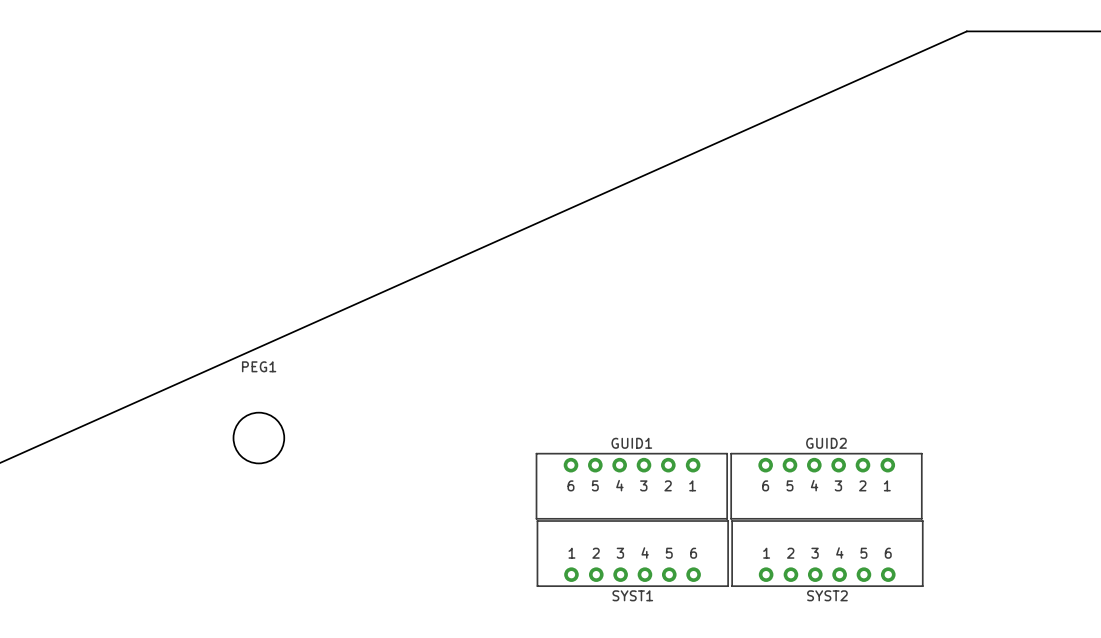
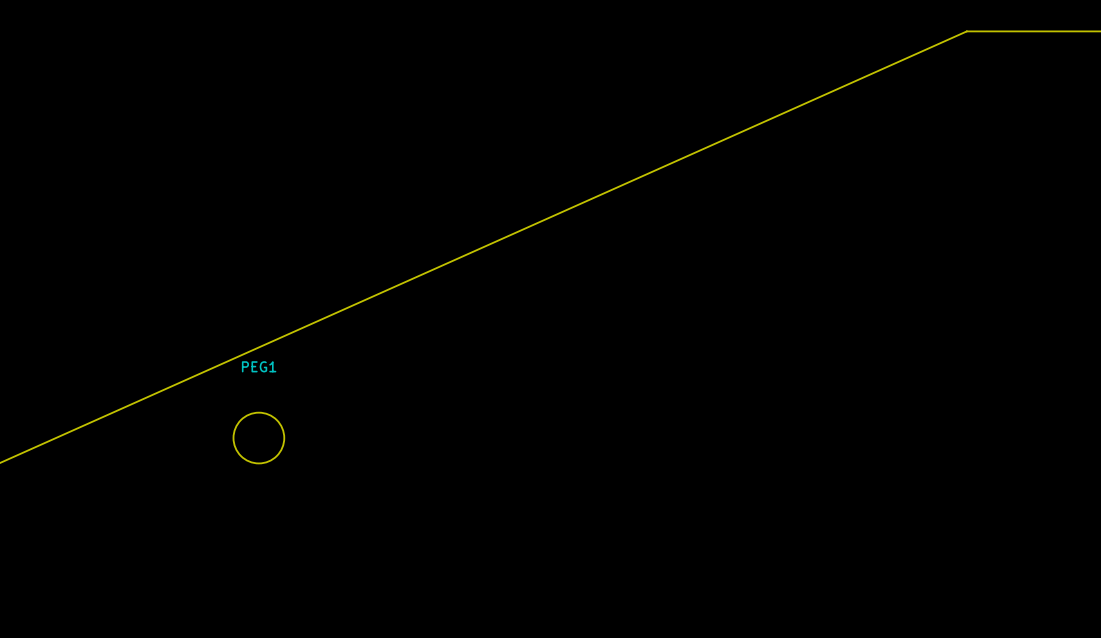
GUID1: (631, 486) -> none
GUID2: (826, 486) -> none
SYST1: (632, 553) -> none
SYST2: (827, 553) -> none

